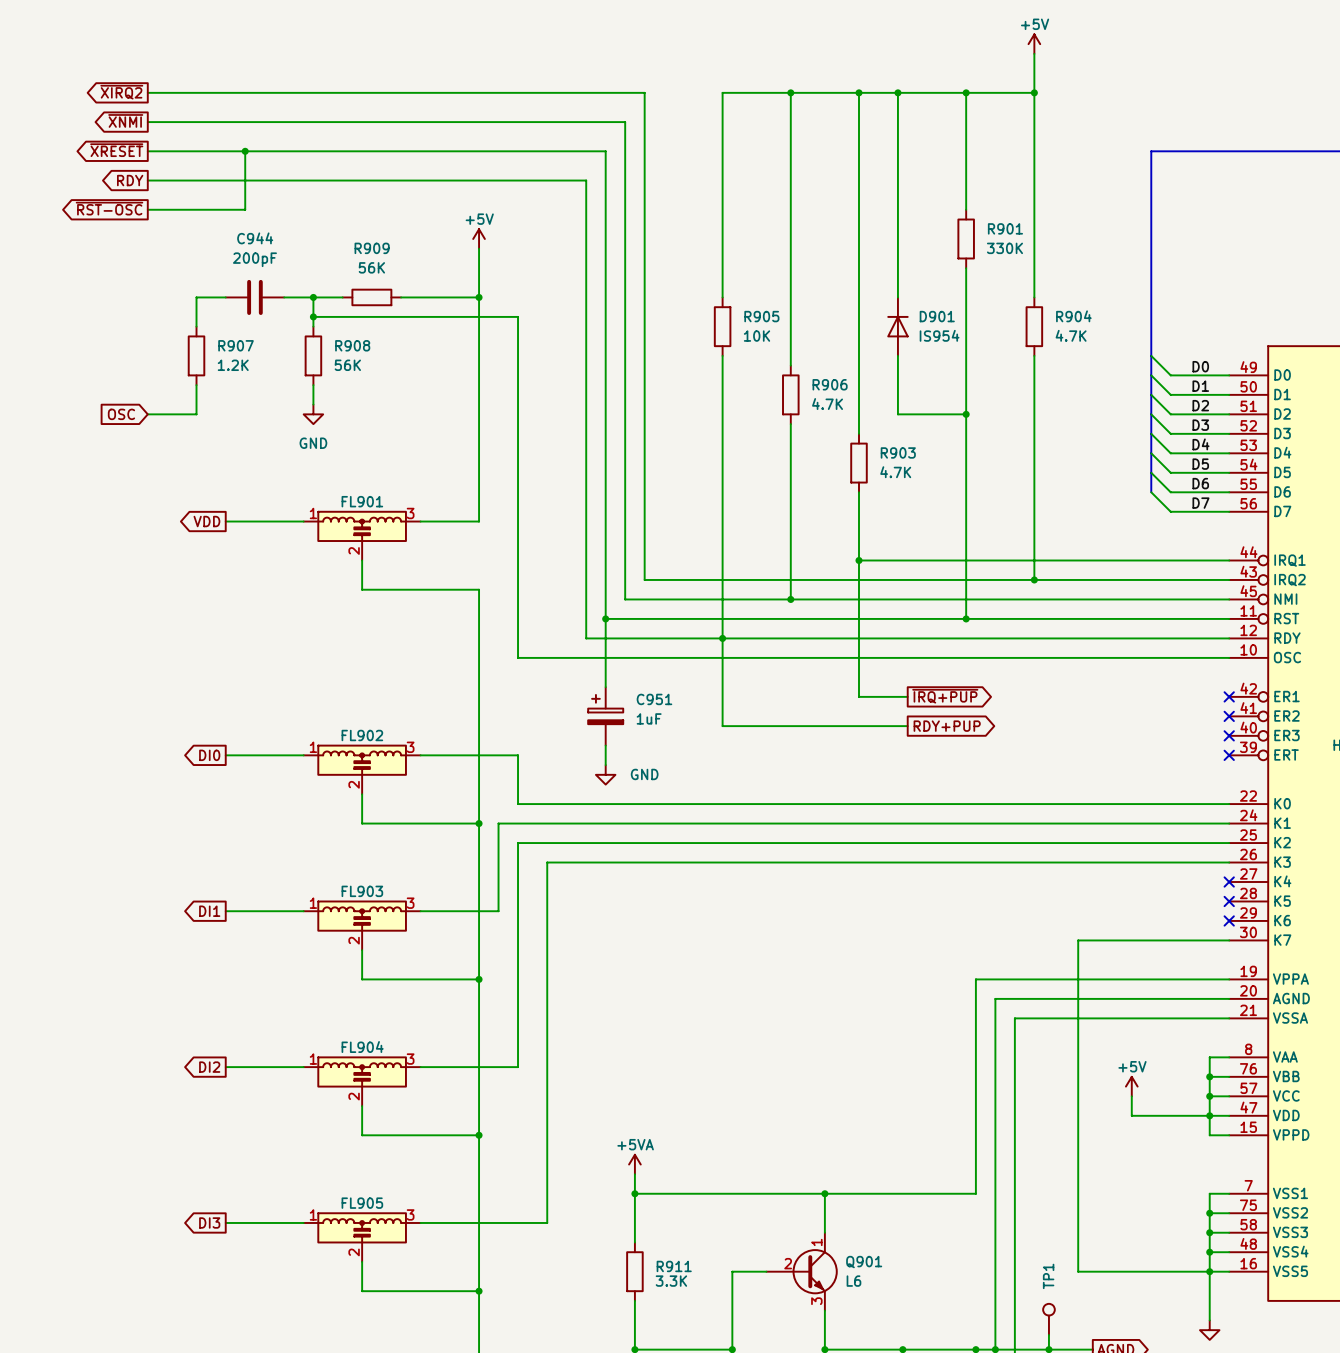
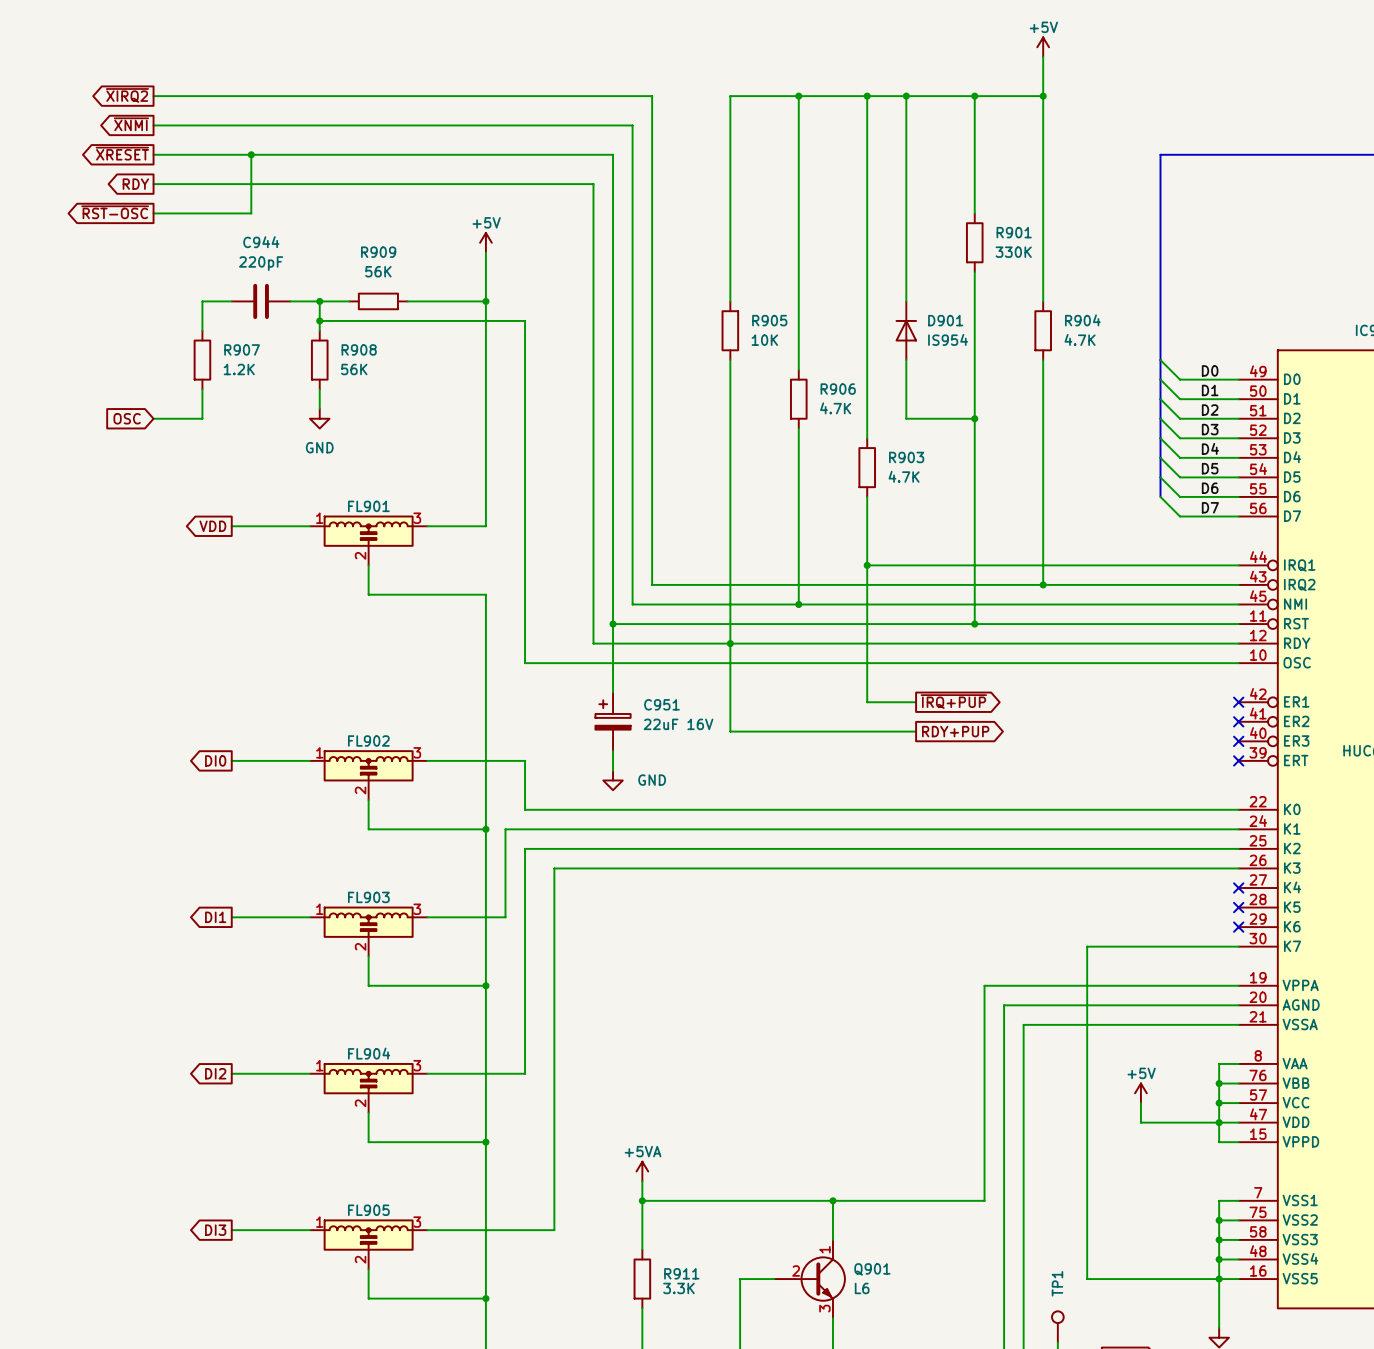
C944 value: 200pF (254, 259) -> 220pF (261, 263)
C951 value: 1uF (649, 718) -> 22uF 16V (678, 724)

